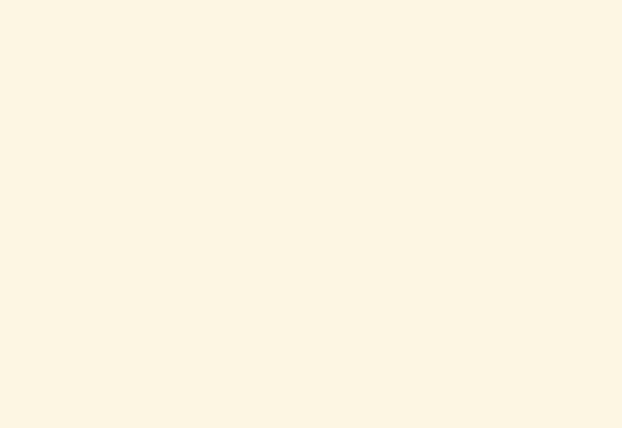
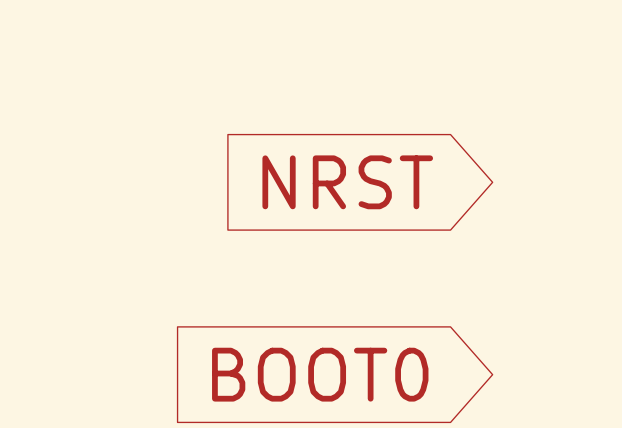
global label: none -> NRST (347, 182)
global label: none -> BOOT0 (320, 374)

